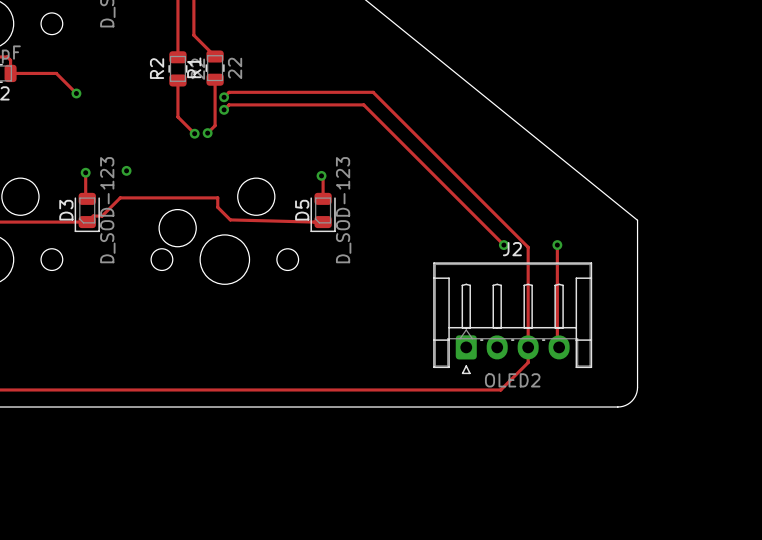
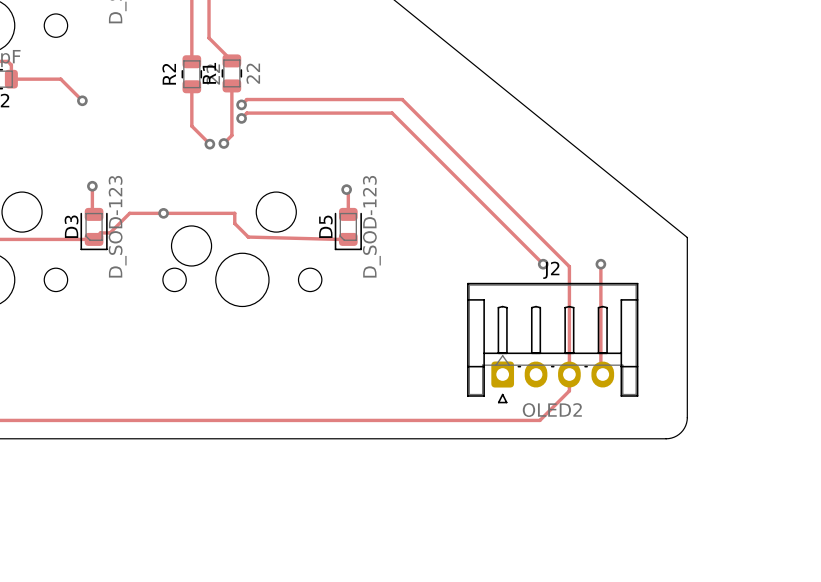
via position: (126, 170) -> (163, 213)

